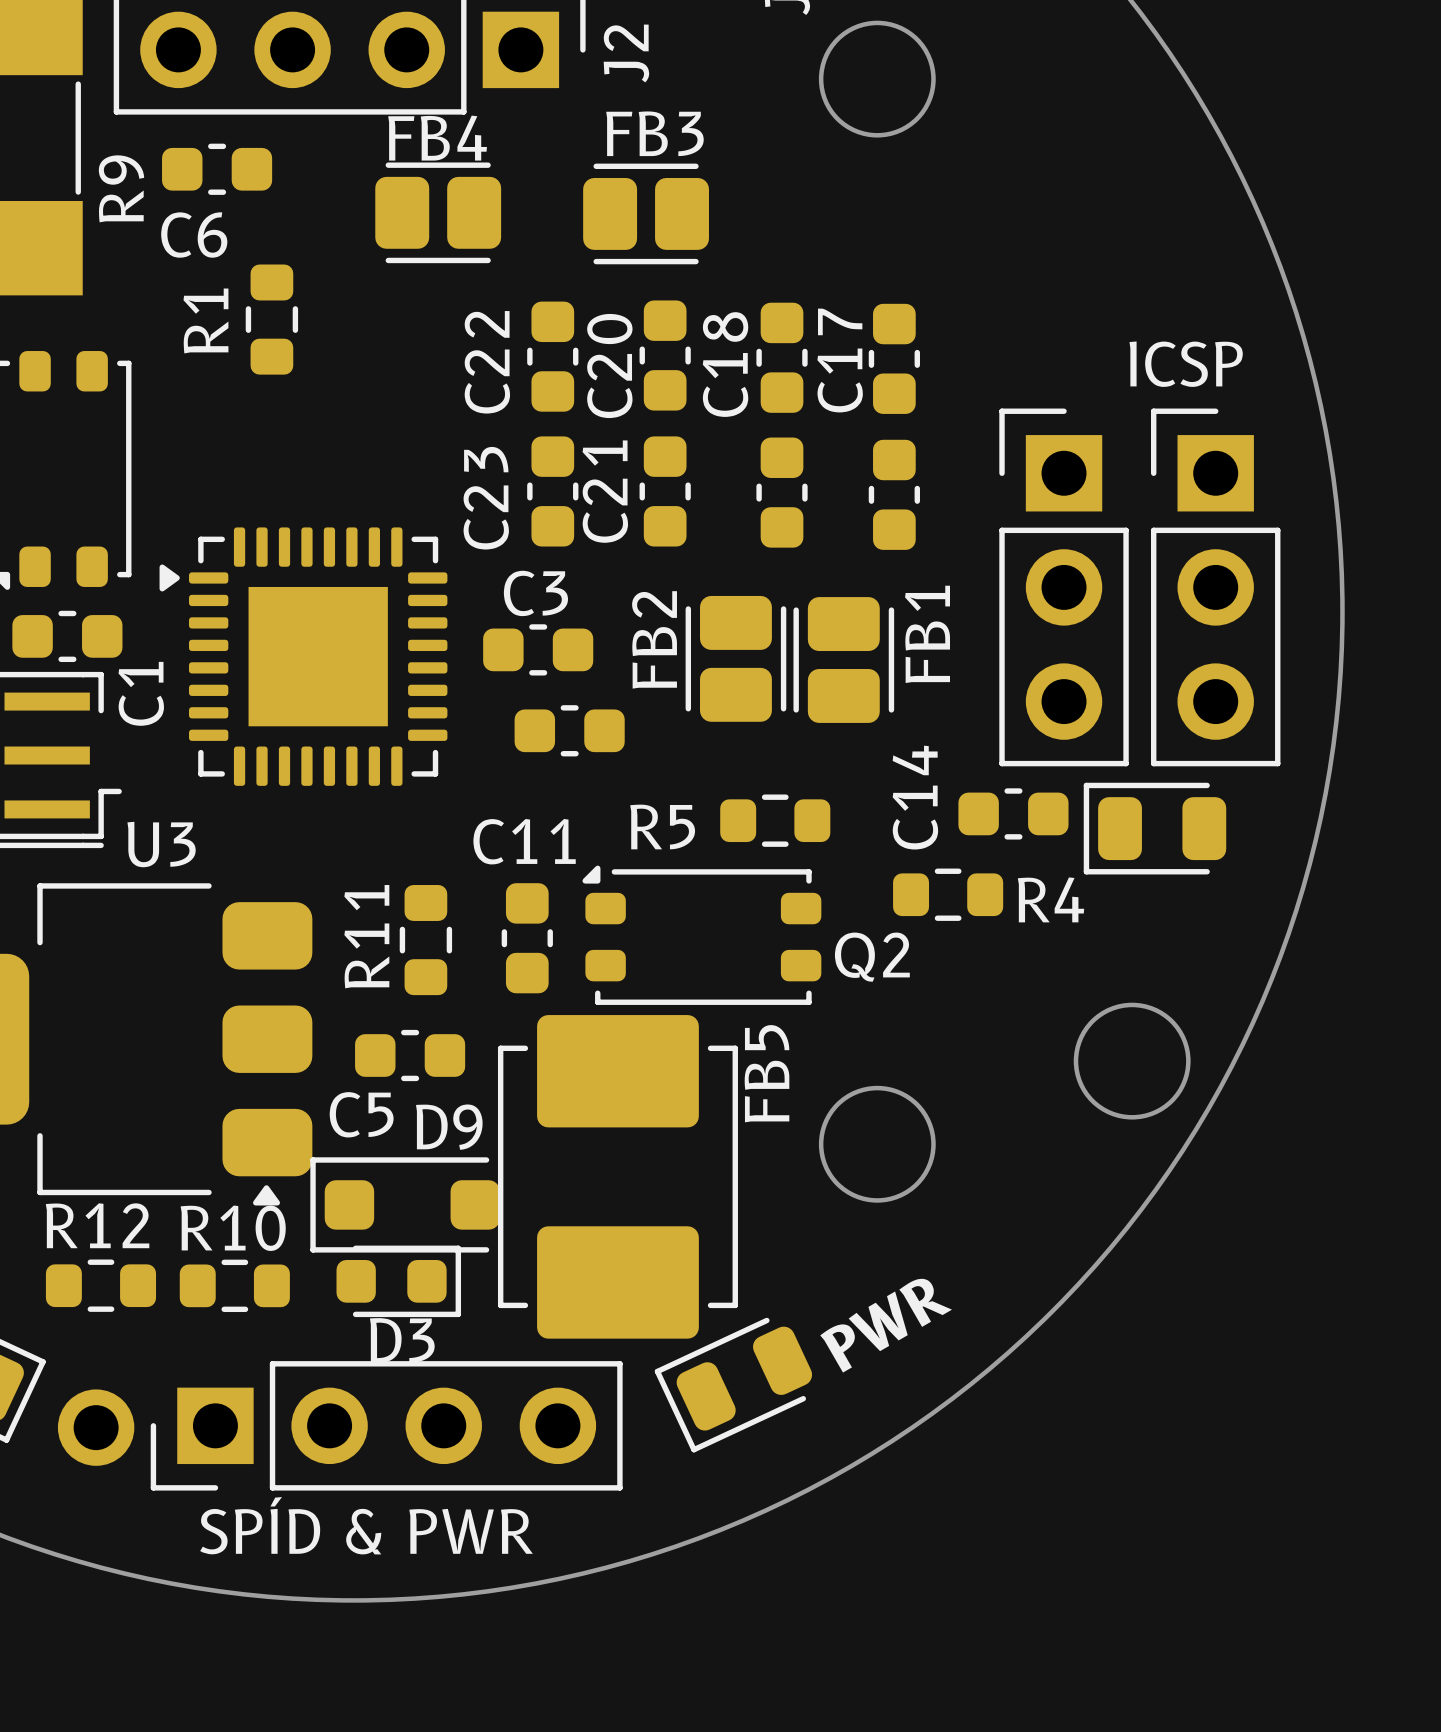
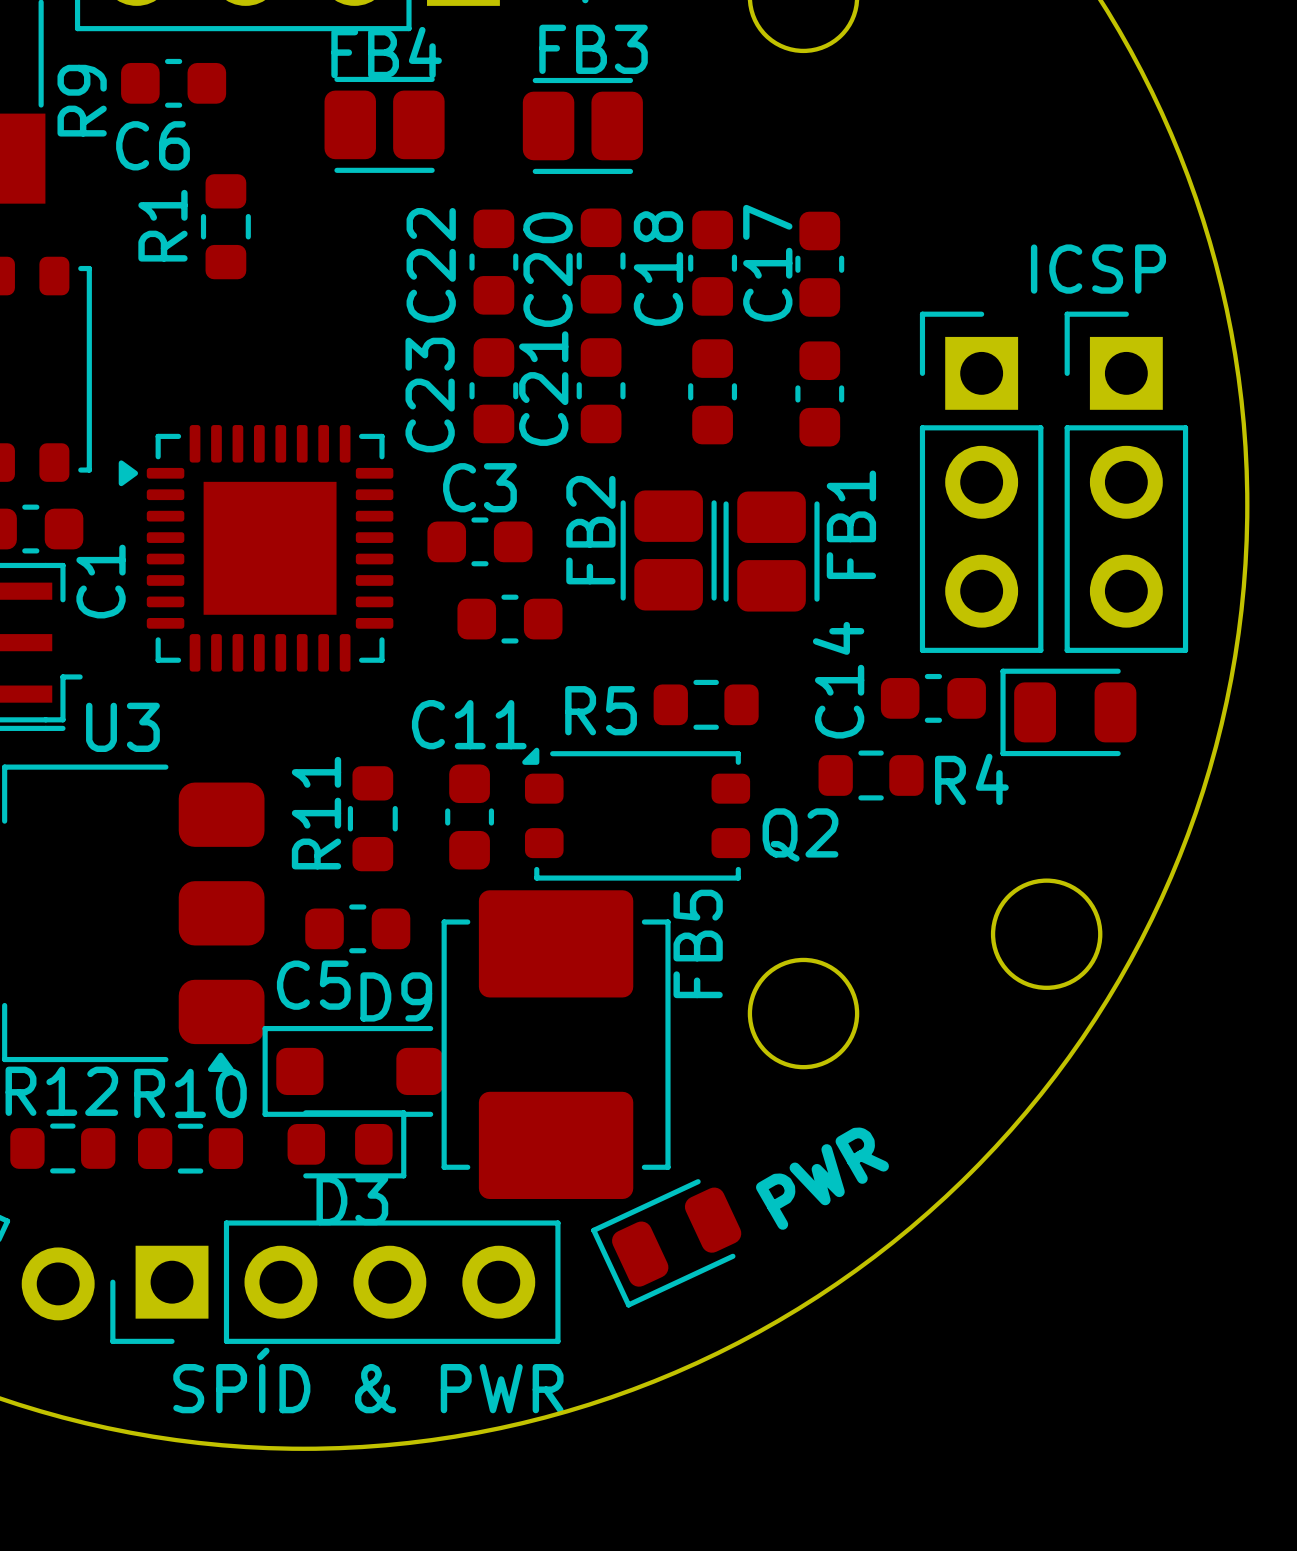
part value position: SPÍD & PWR (366, 1525) -> SPÍD & PWR (368, 1380)

